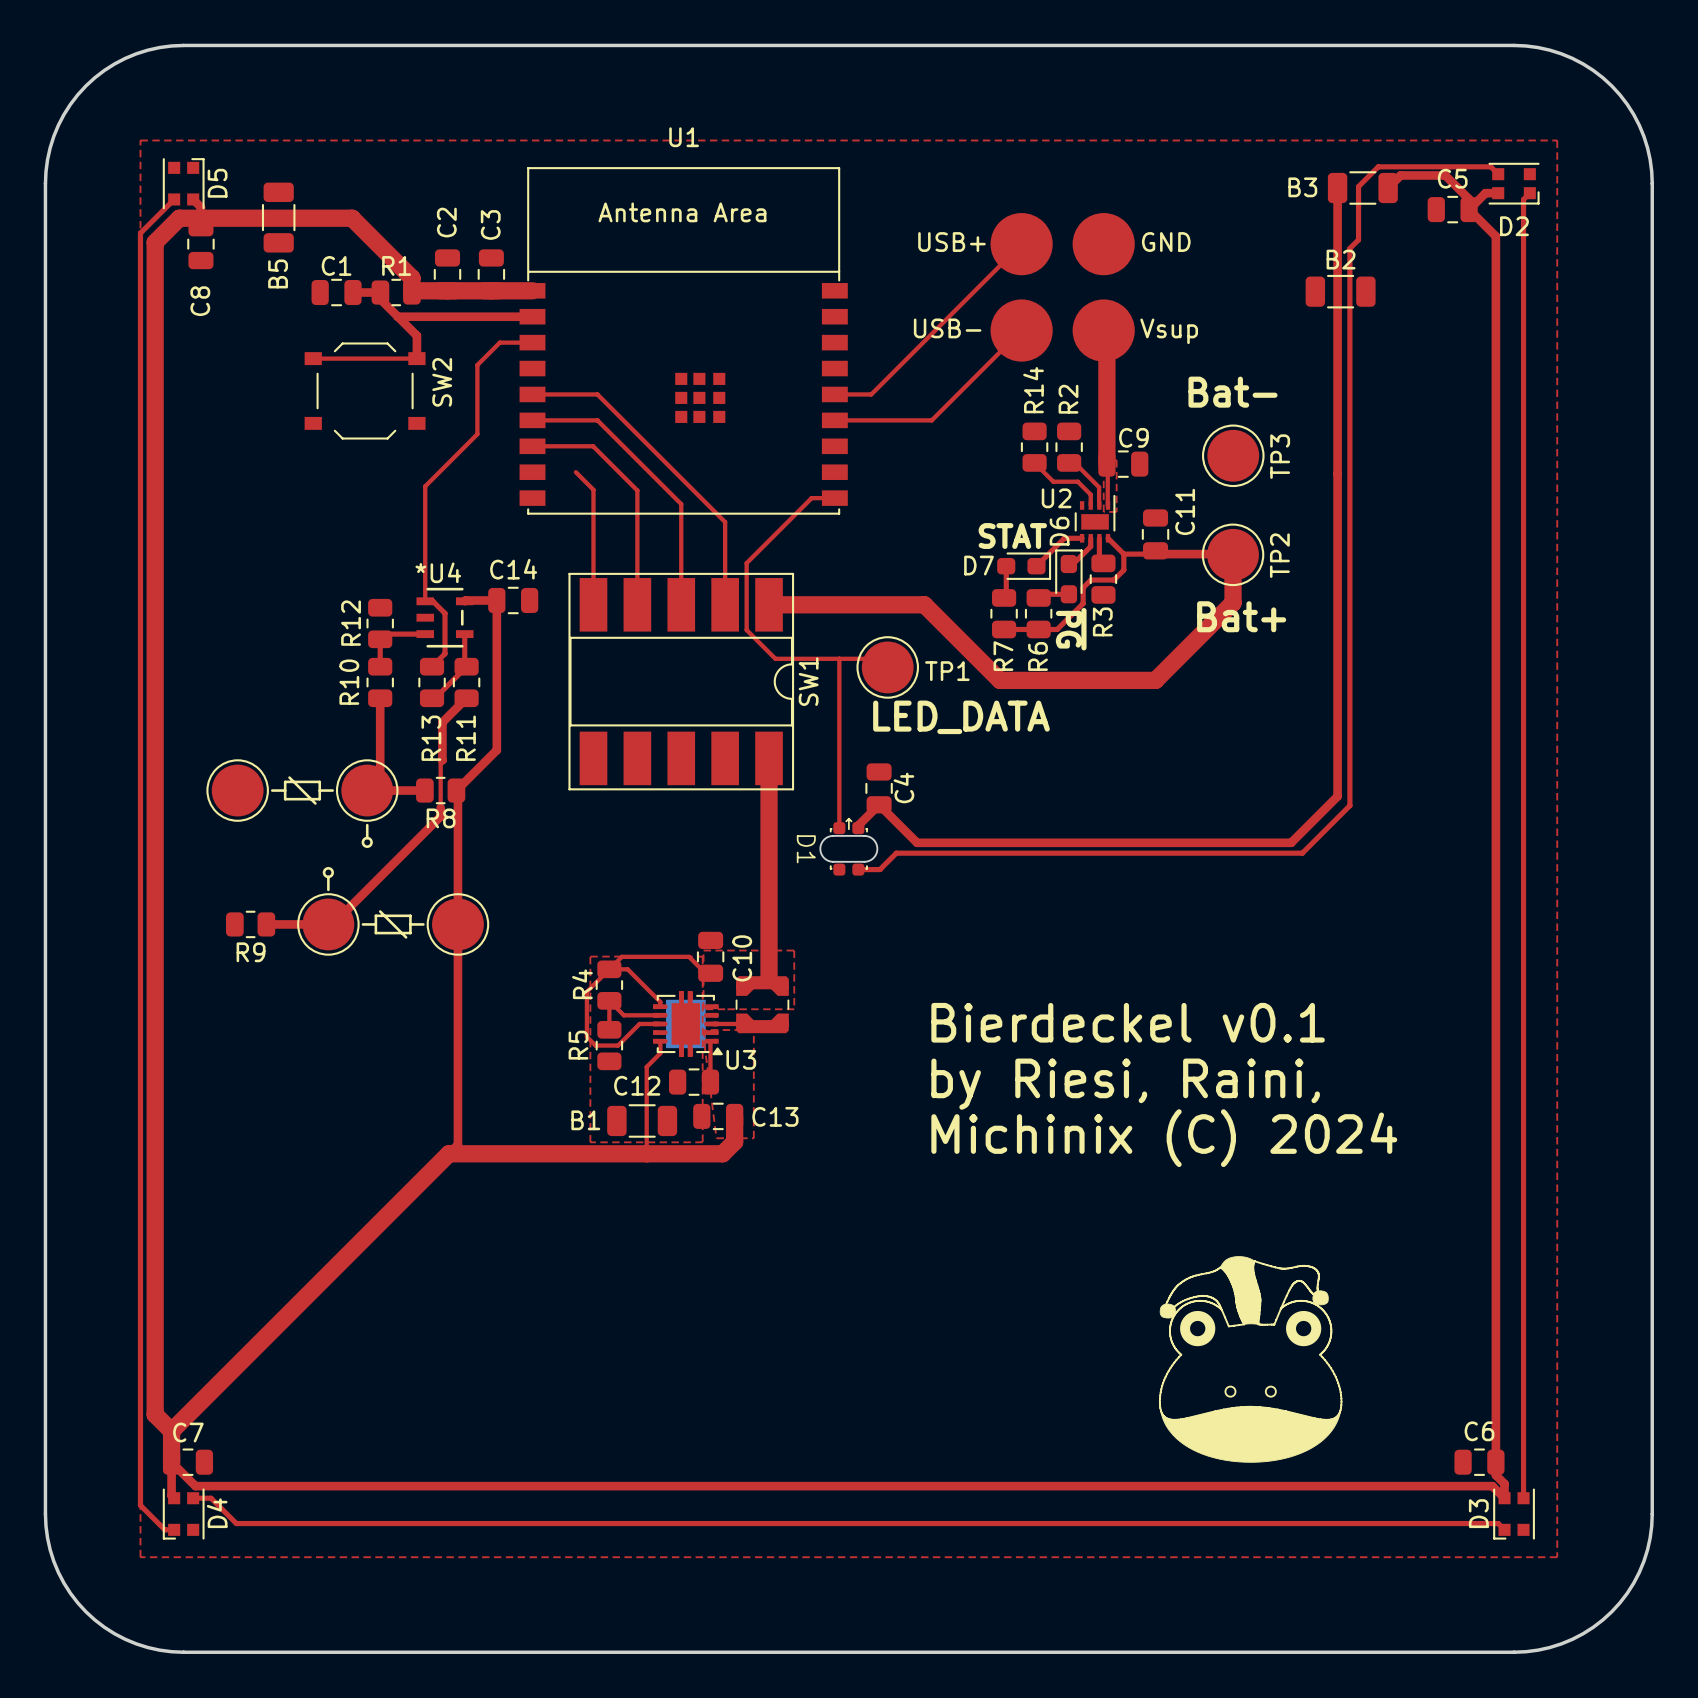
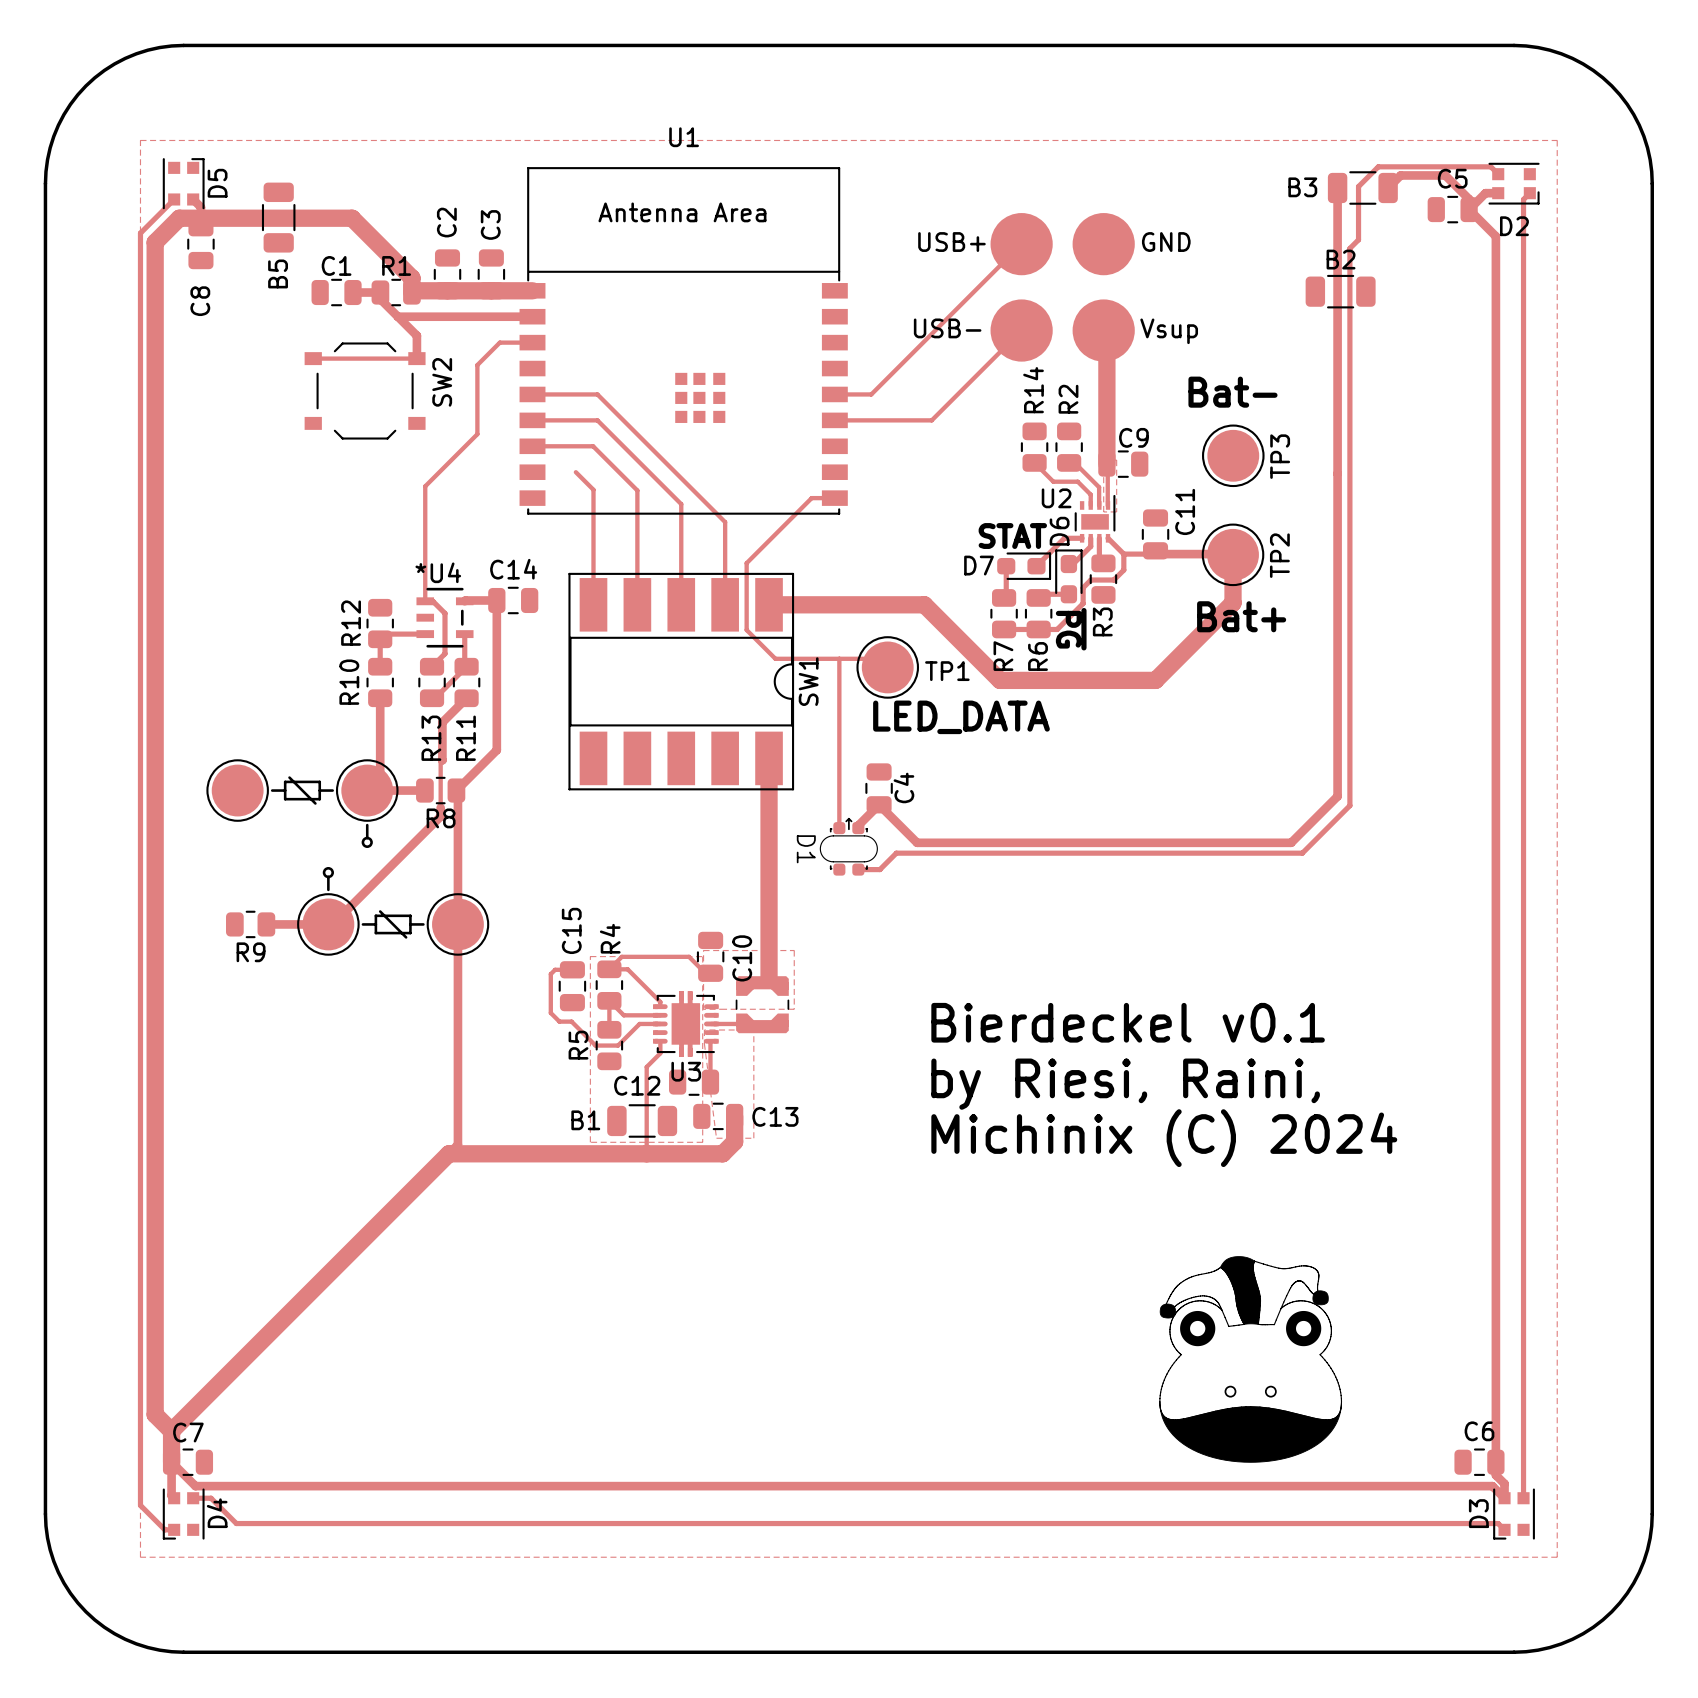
top track: (607, 971) (586, 991) (586, 1036) -> (572, 969) (555, 969) (550, 974) (550, 1012) (559, 1021) (571, 1021) (586, 1036)
R4 name position: R4 (582, 984) -> R4 (610, 938)
C15: none -> (572, 986)
U3 footprint: [653, 991, 723, 1057] -> [653, 991, 719, 1057]
U3 name position: U3 (741, 1059) -> U3 (686, 1071)

